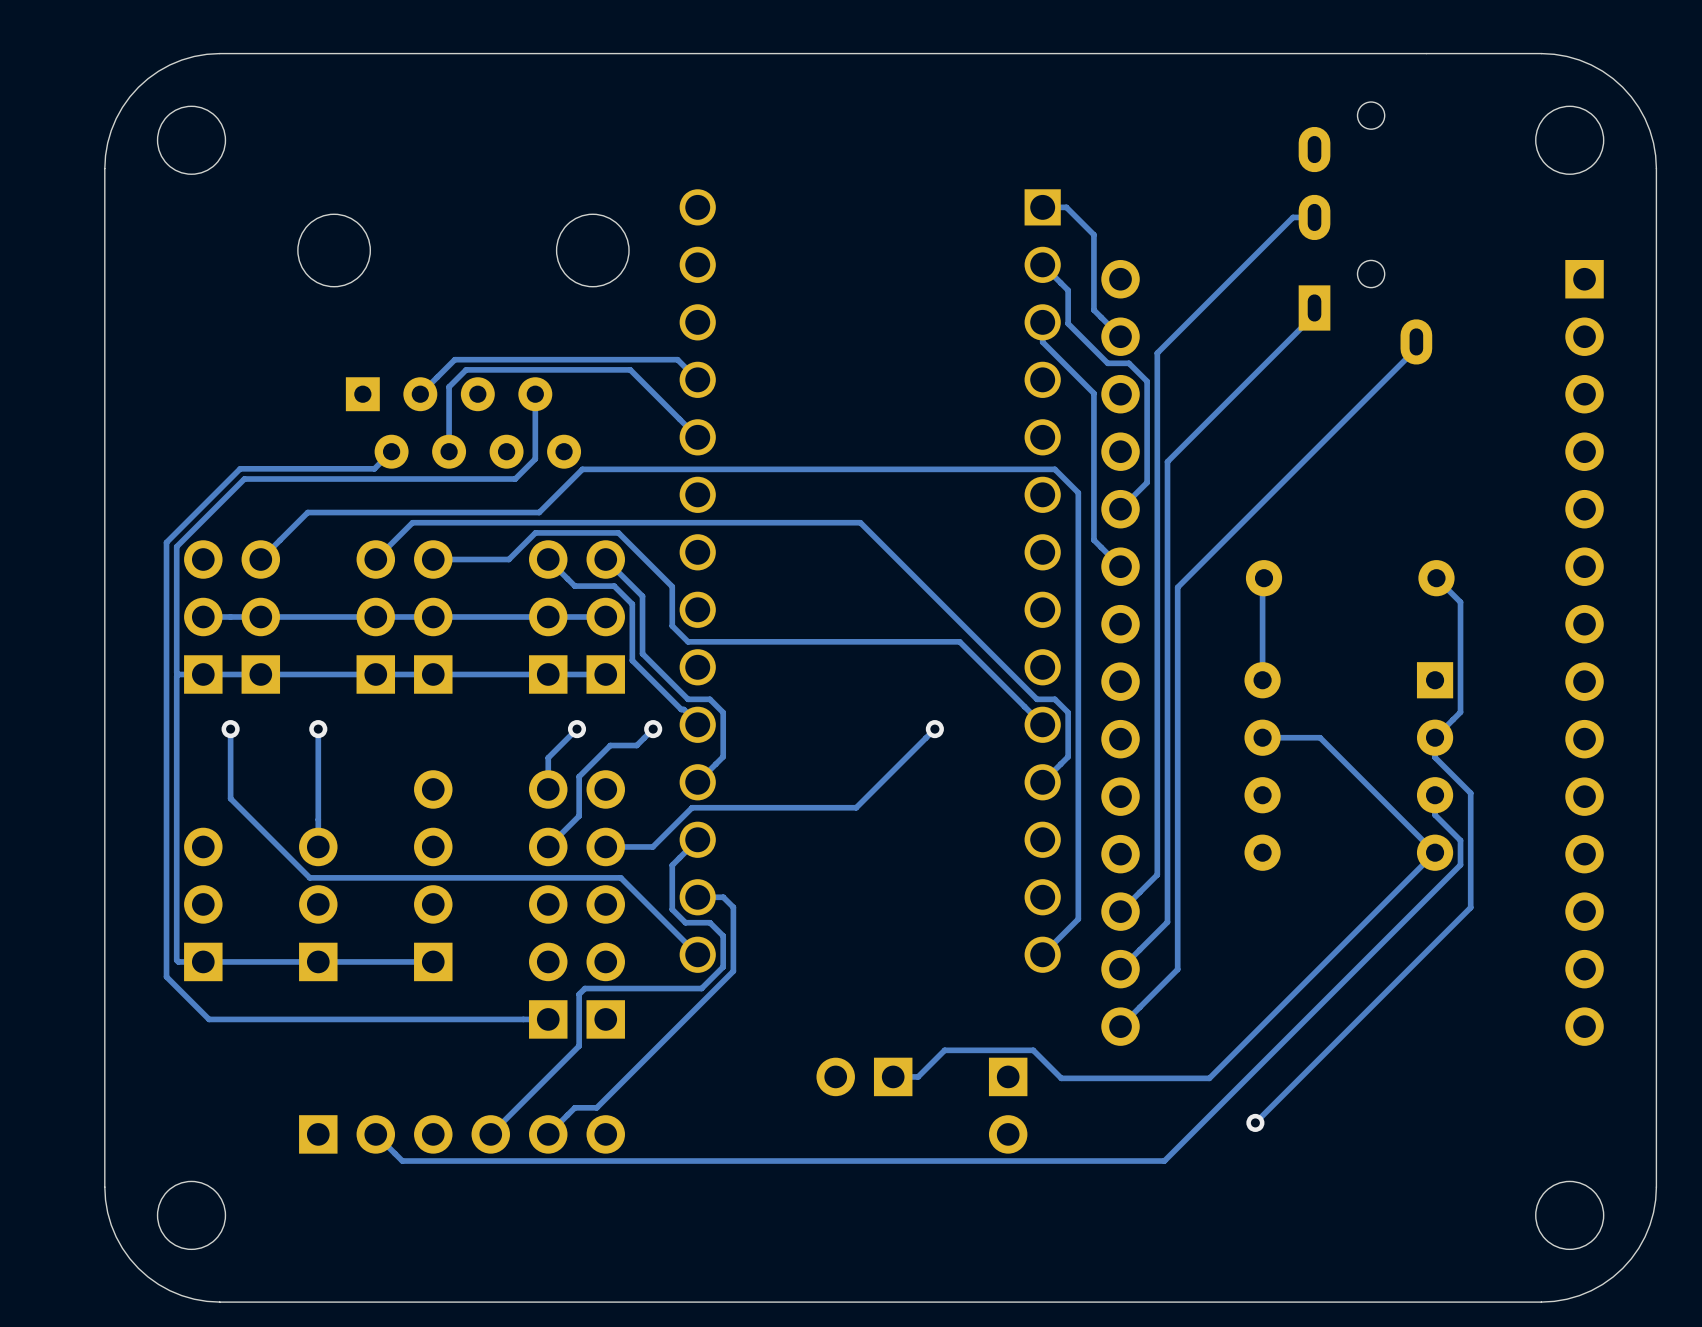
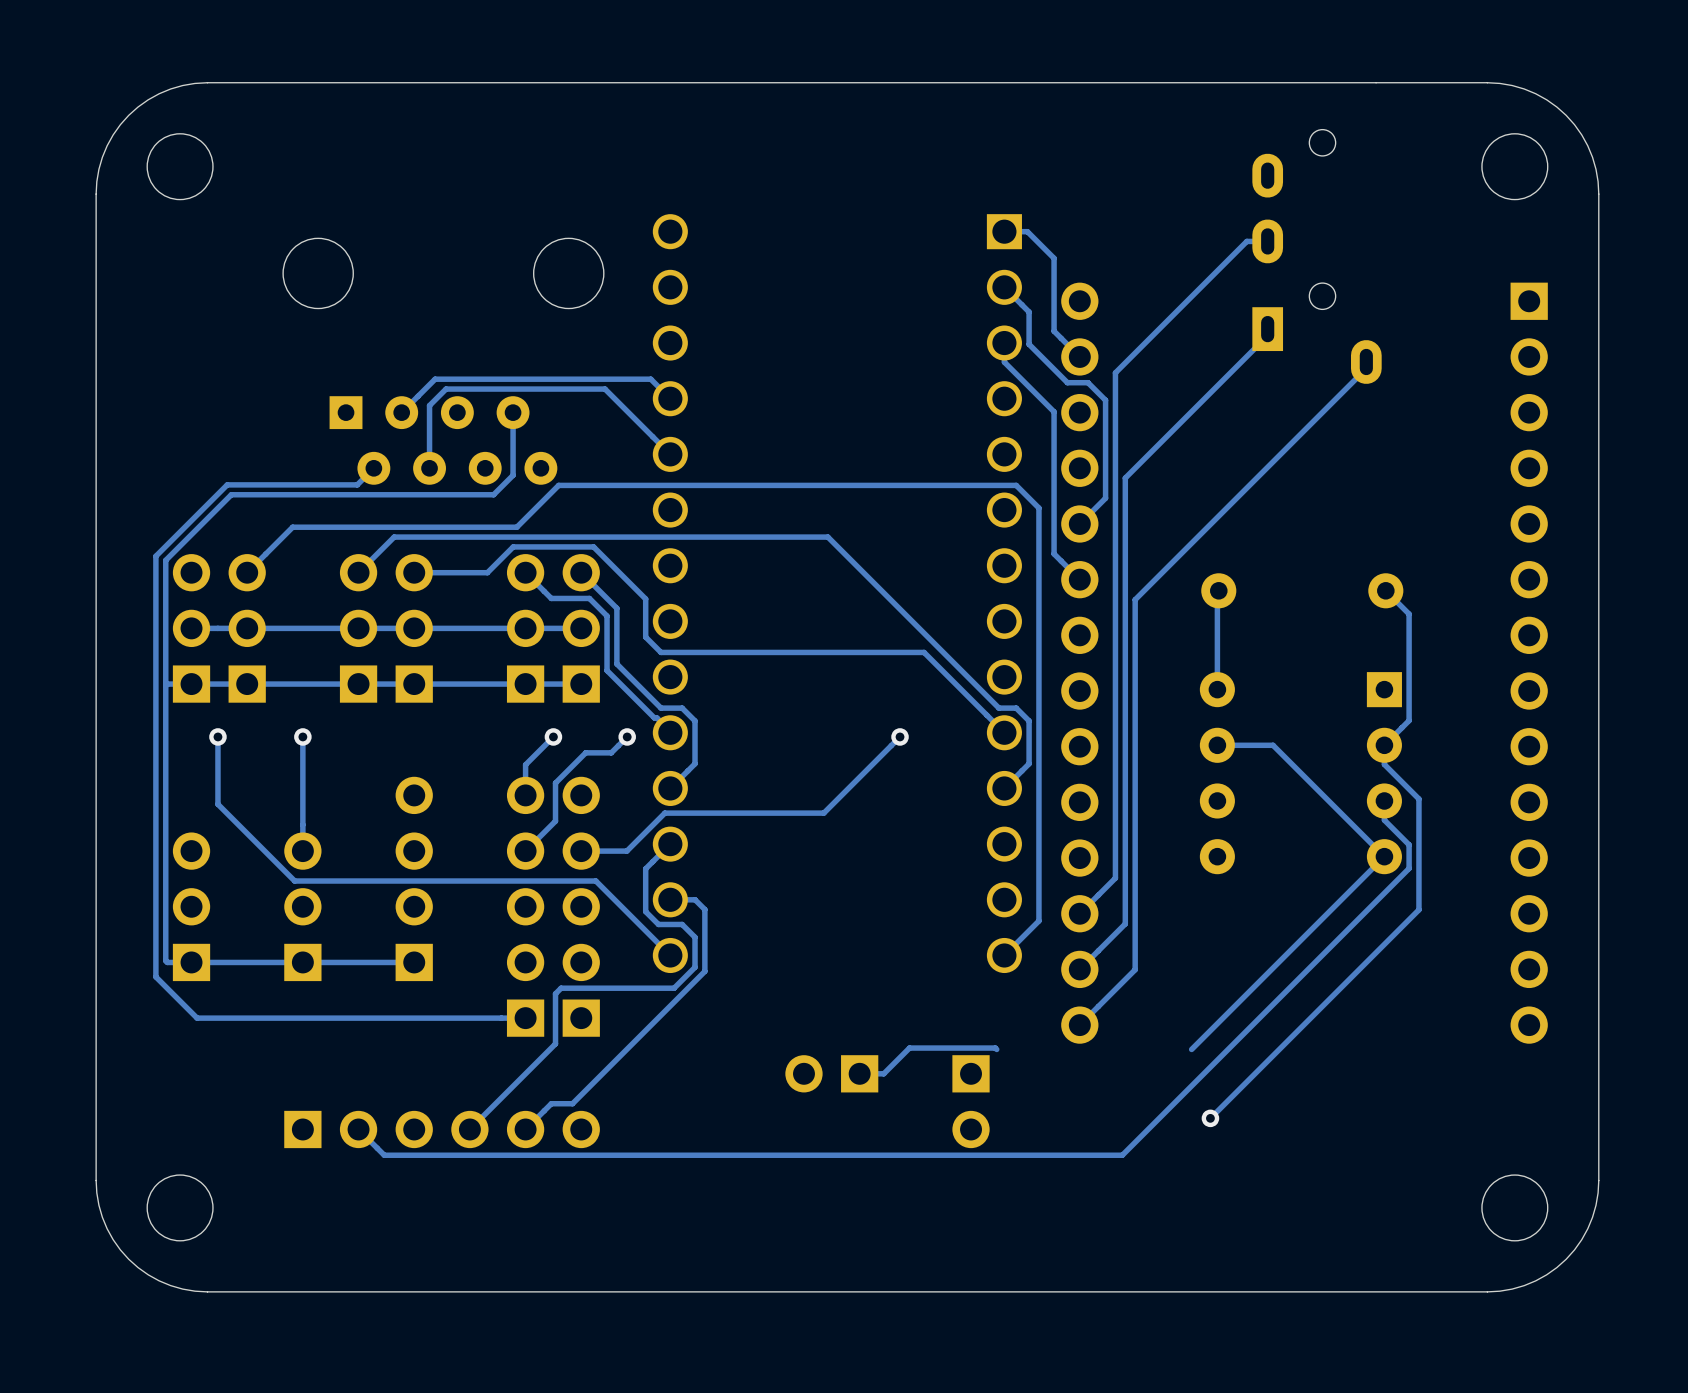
track: (1235, 1051) (1209, 1078) (1061, 1078) (1034, 1051) -> none

